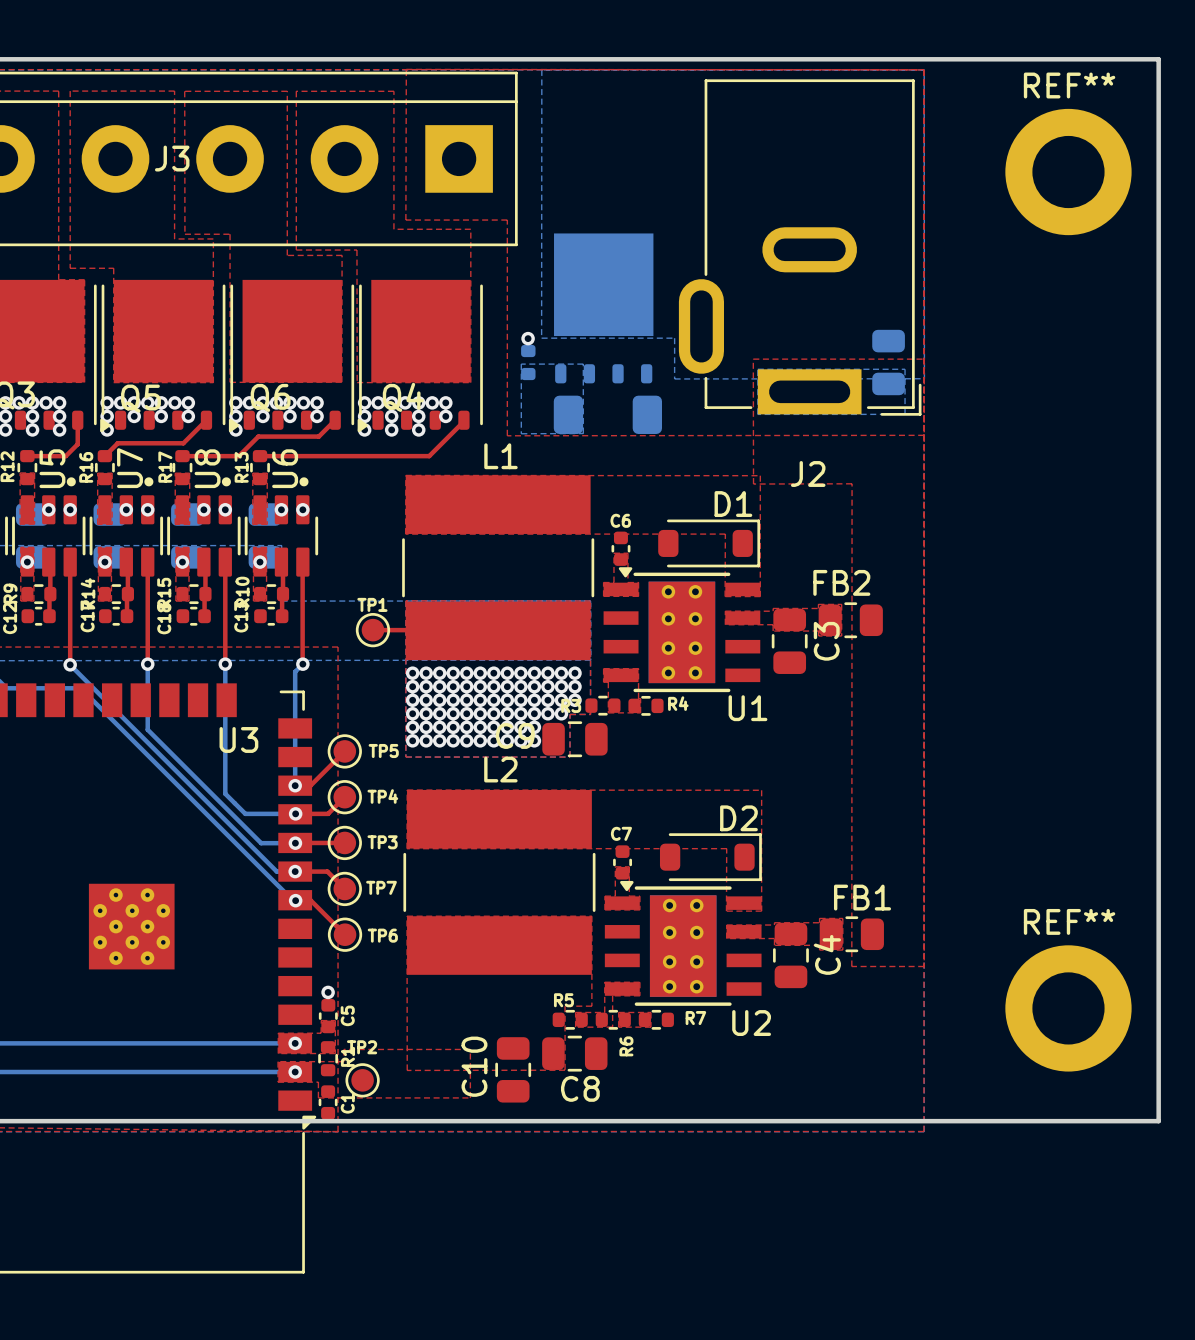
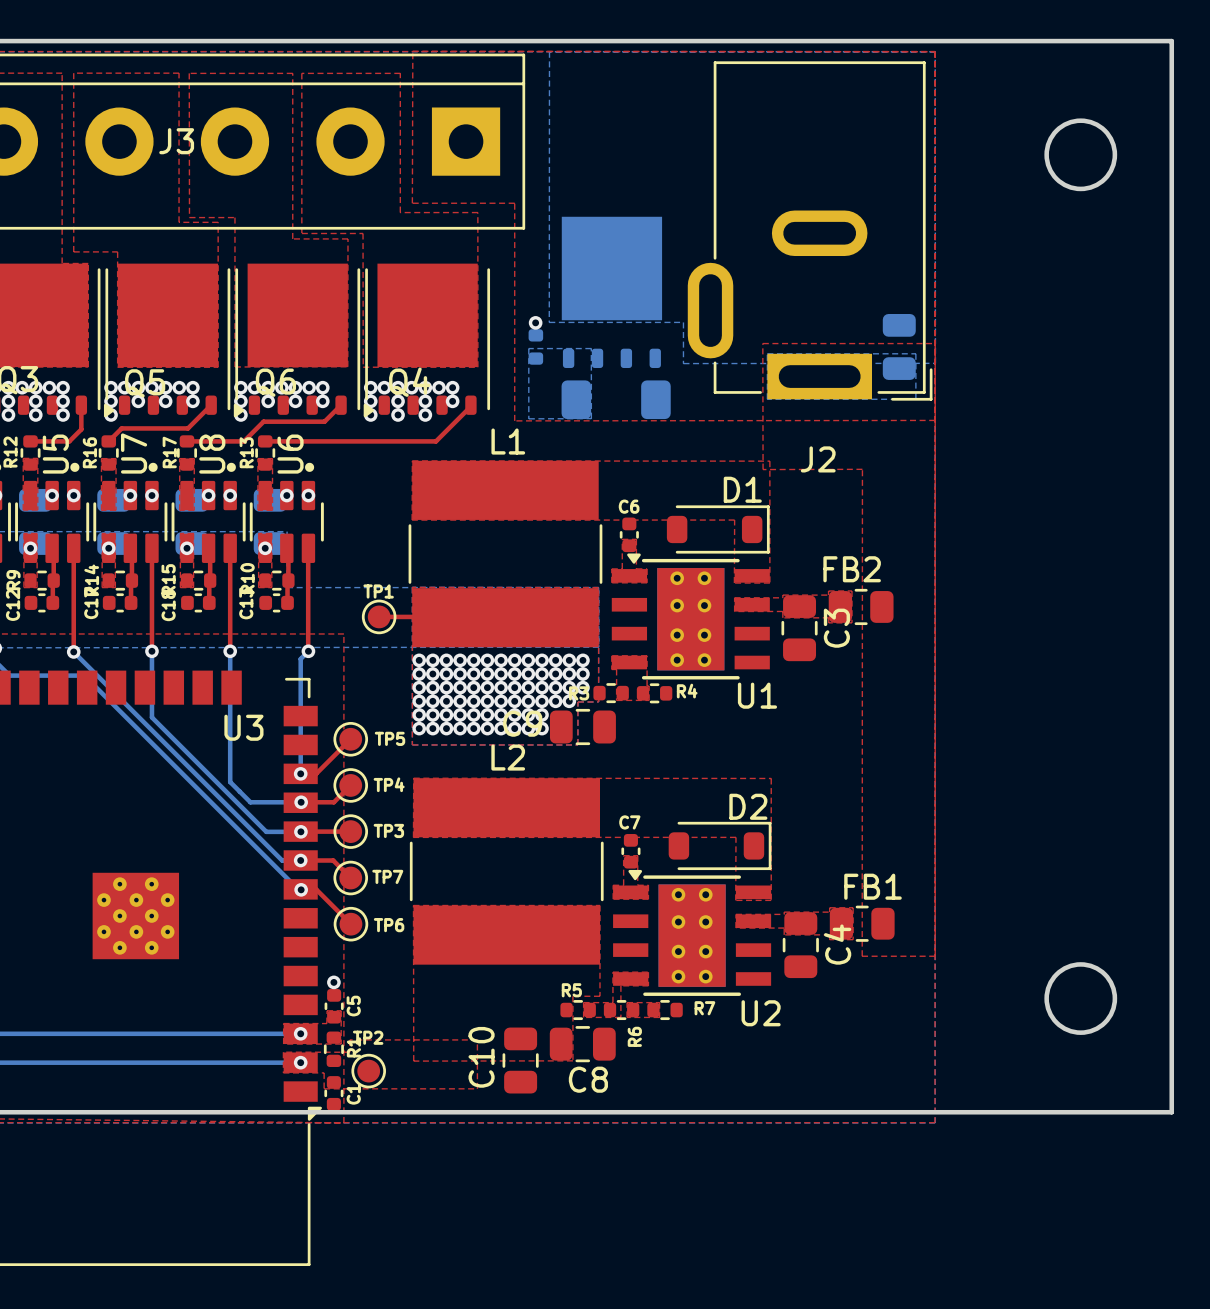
round board edge: none -> [1044, 118, 1118, 192]
REF**: (1068, 172) -> none
round board edge: none -> [1044, 962, 1118, 1035]
REF**: (1068, 1008) -> none

